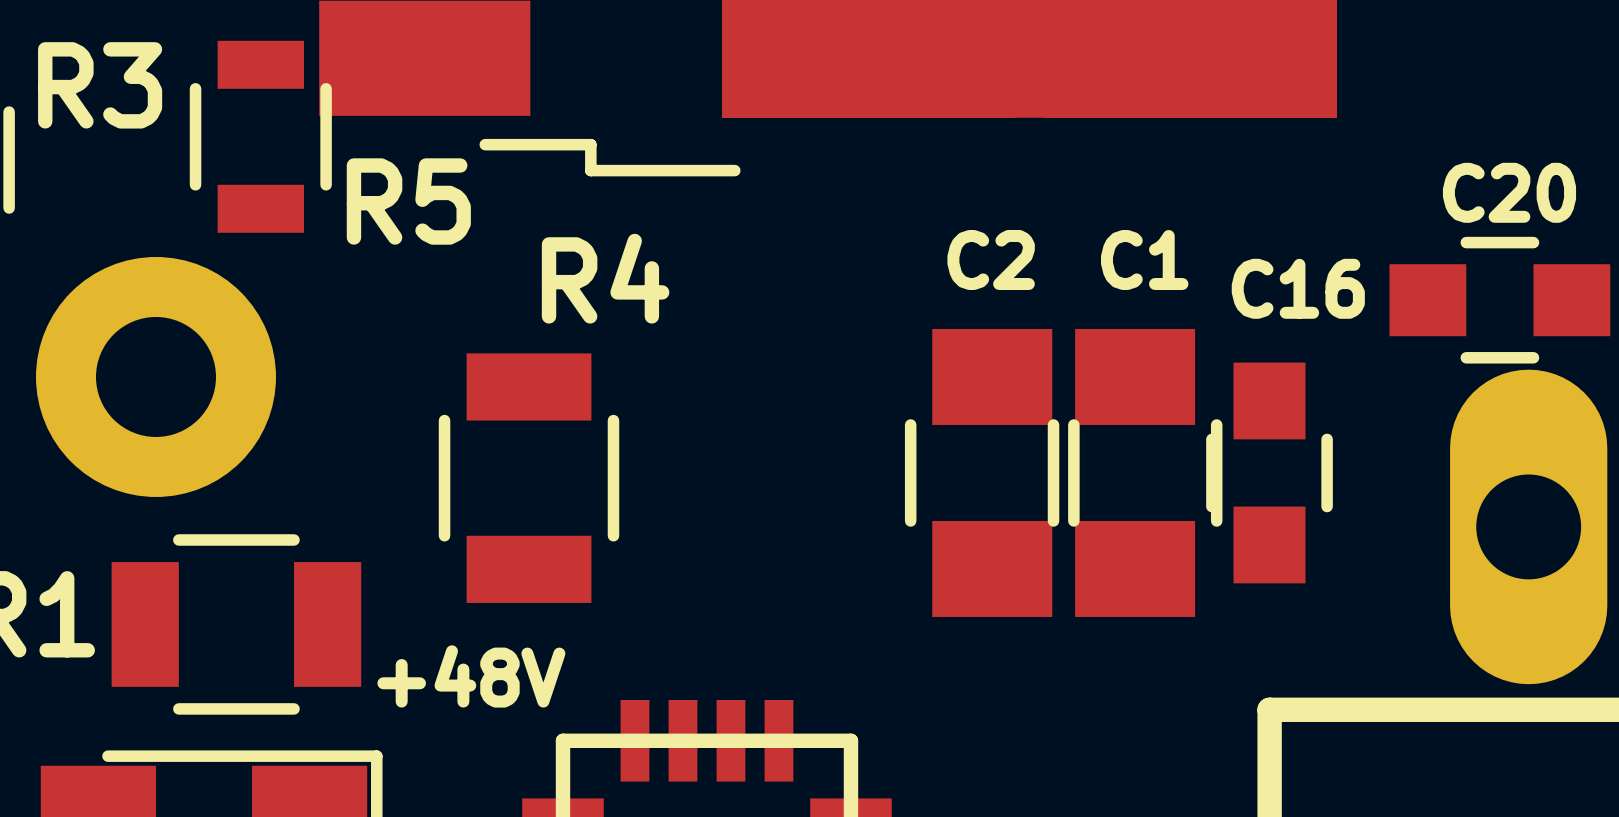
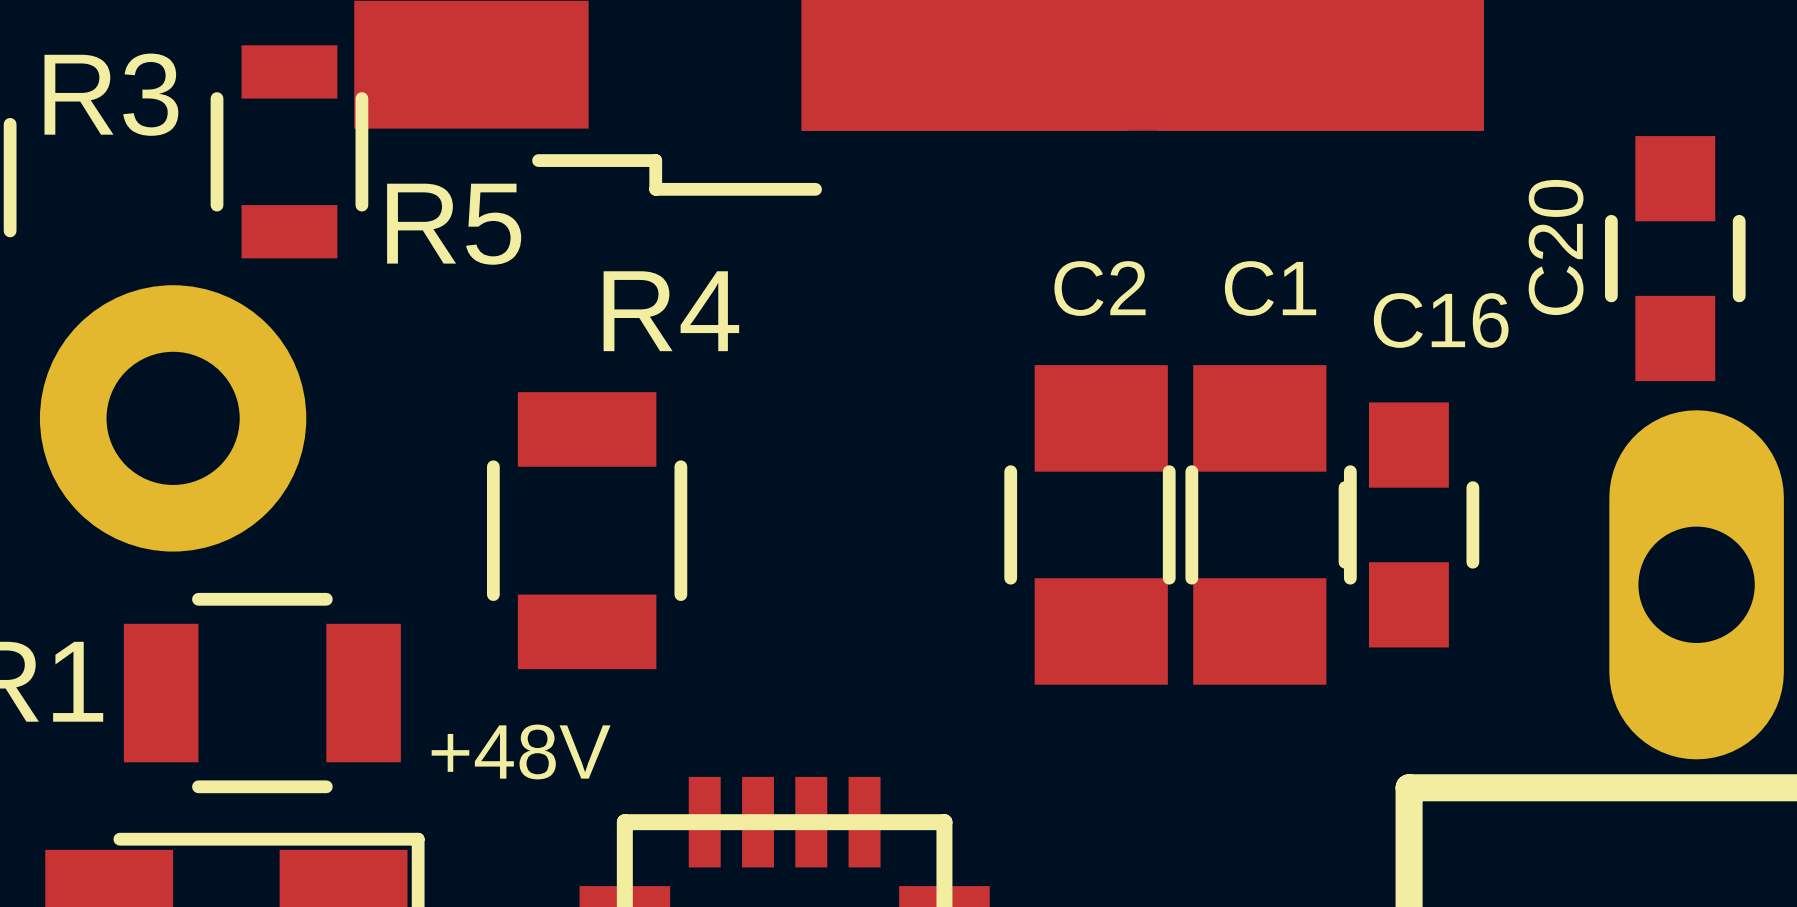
C20 rotation: 0° (1499, 300) -> 90° clockwise (1675, 258)

